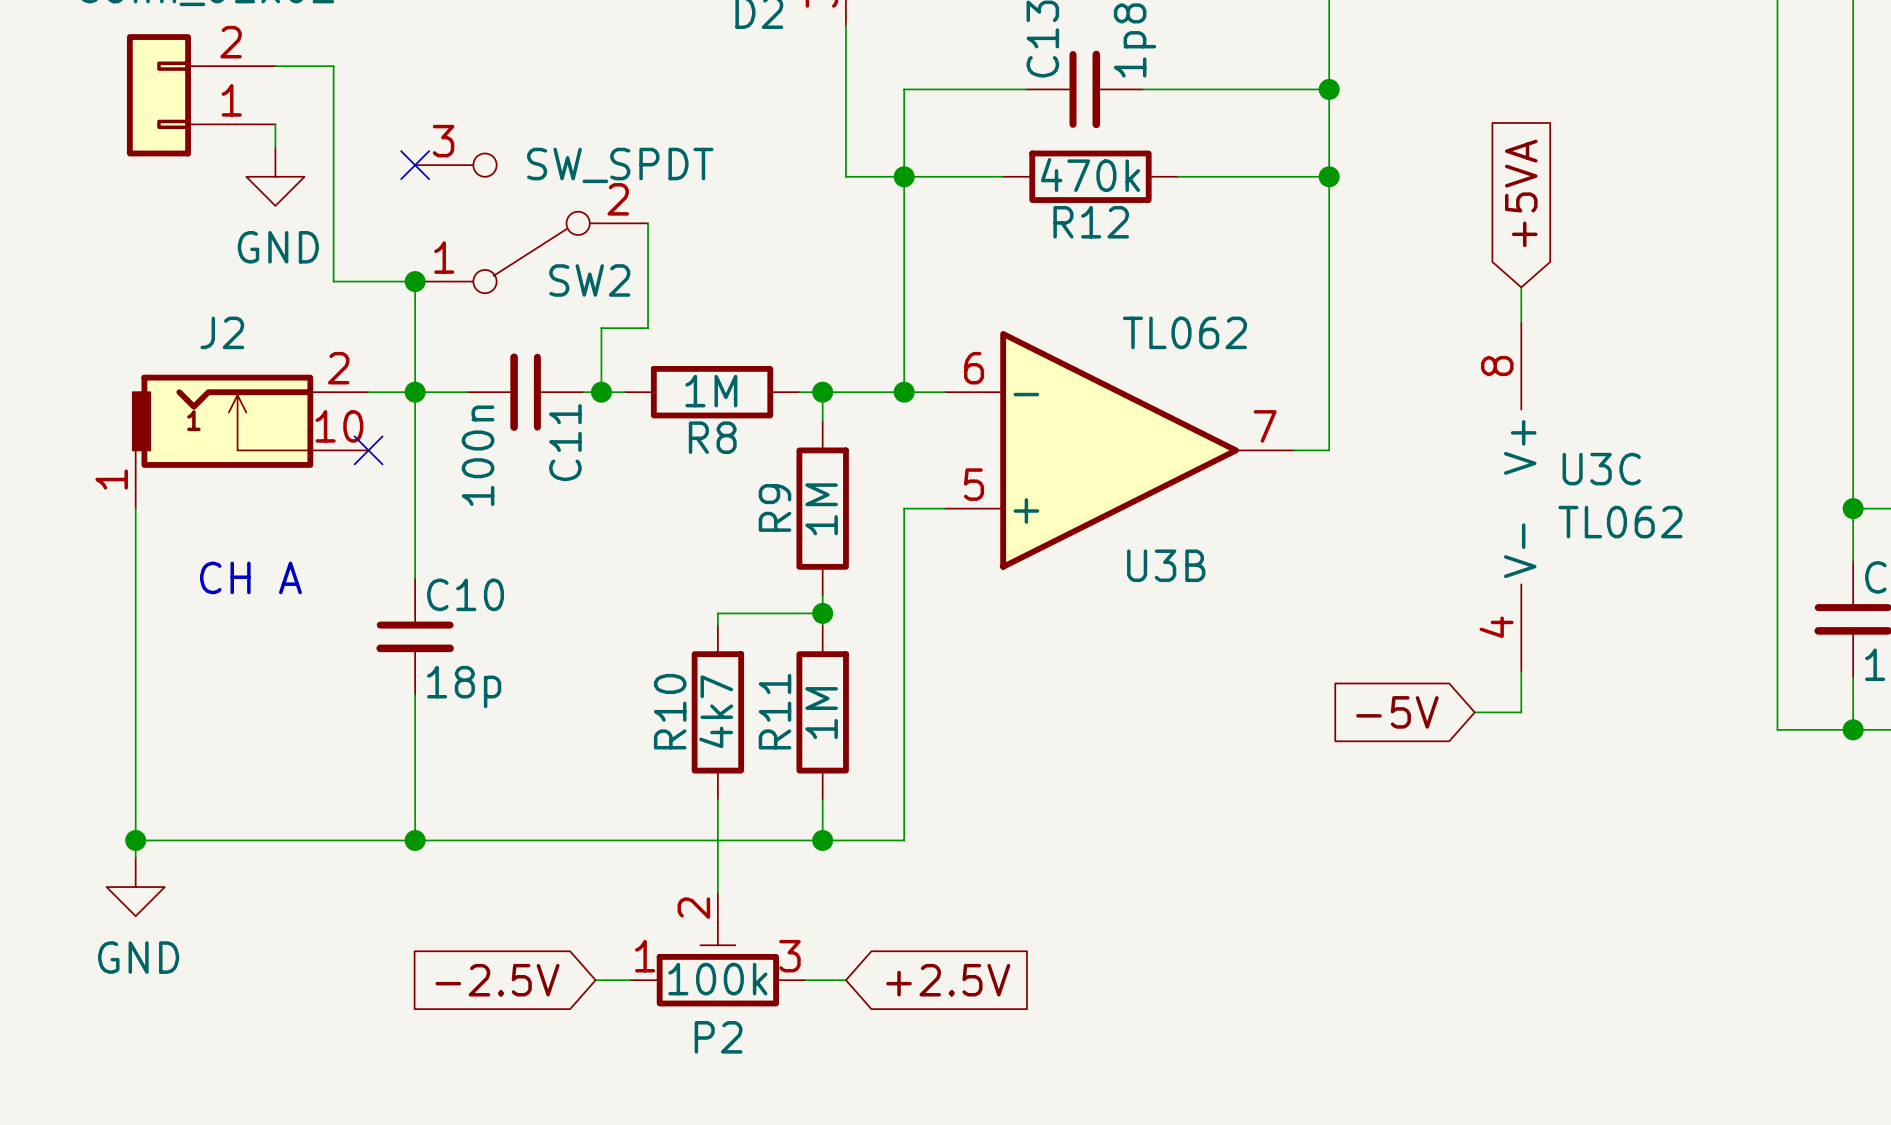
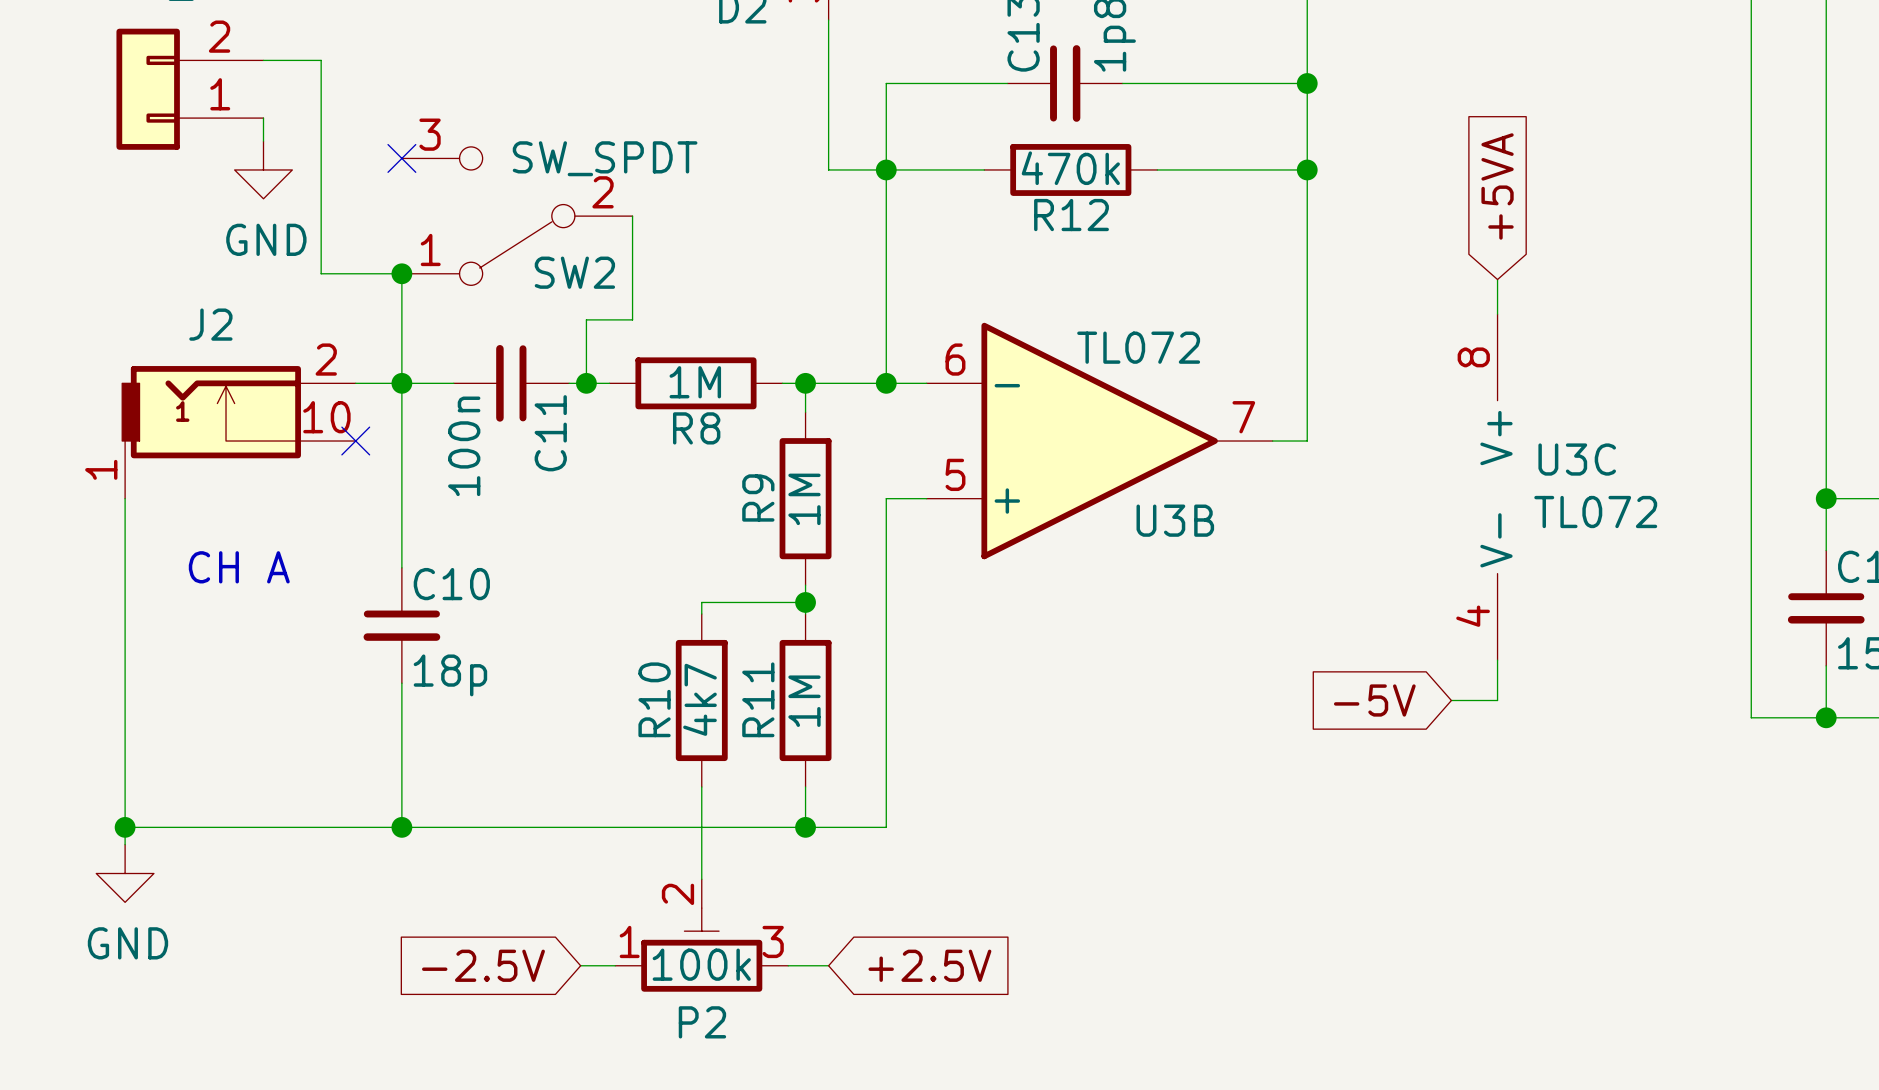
U3B value: TL062 (1184, 332) -> TL072 (1138, 347)
U3C value: TL062 (1620, 522) -> TL072 (1595, 512)
U3B name position: U3B (1166, 565) -> U3B (1175, 520)

